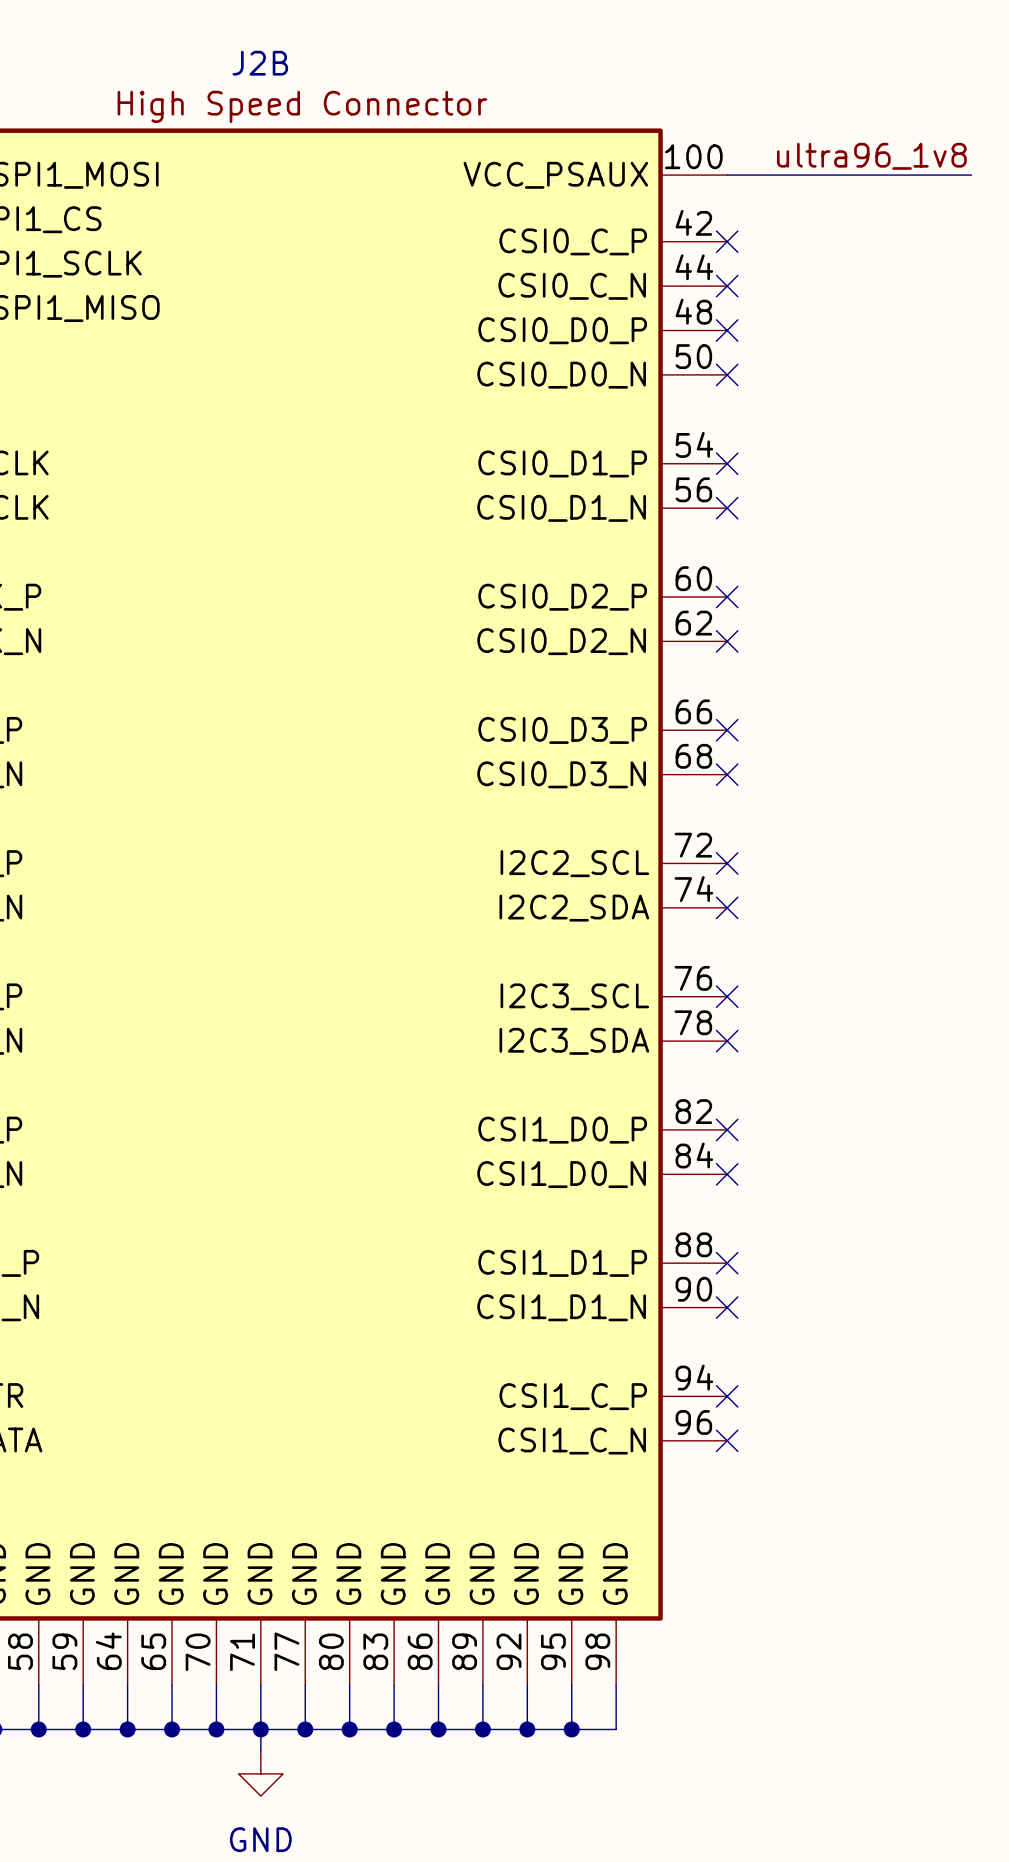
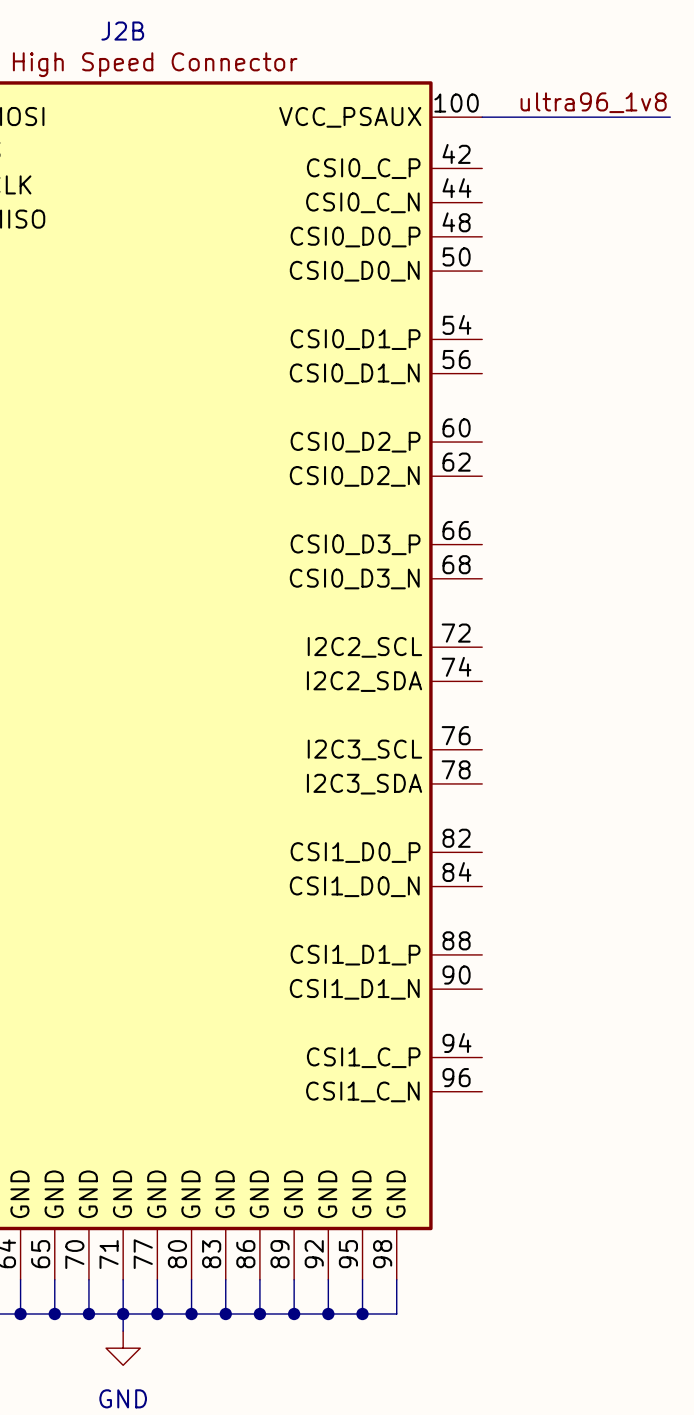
no-connect mark: (727, 241) -> none
no-connect mark: (727, 286) -> none
no-connect mark: (727, 330) -> none
no-connect mark: (727, 374) -> none
no-connect mark: (727, 463) -> none
no-connect mark: (727, 508) -> none
no-connect mark: (727, 596) -> none
no-connect mark: (727, 641) -> none
no-connect mark: (727, 730) -> none
no-connect mark: (727, 774) -> none
no-connect mark: (727, 863) -> none
no-connect mark: (727, 907) -> none
no-connect mark: (727, 996) -> none
no-connect mark: (727, 1041) -> none
no-connect mark: (727, 1129) -> none
no-connect mark: (727, 1174) -> none
no-connect mark: (727, 1263) -> none
no-connect mark: (727, 1307) -> none
no-connect mark: (727, 1396) -> none
no-connect mark: (727, 1440) -> none

